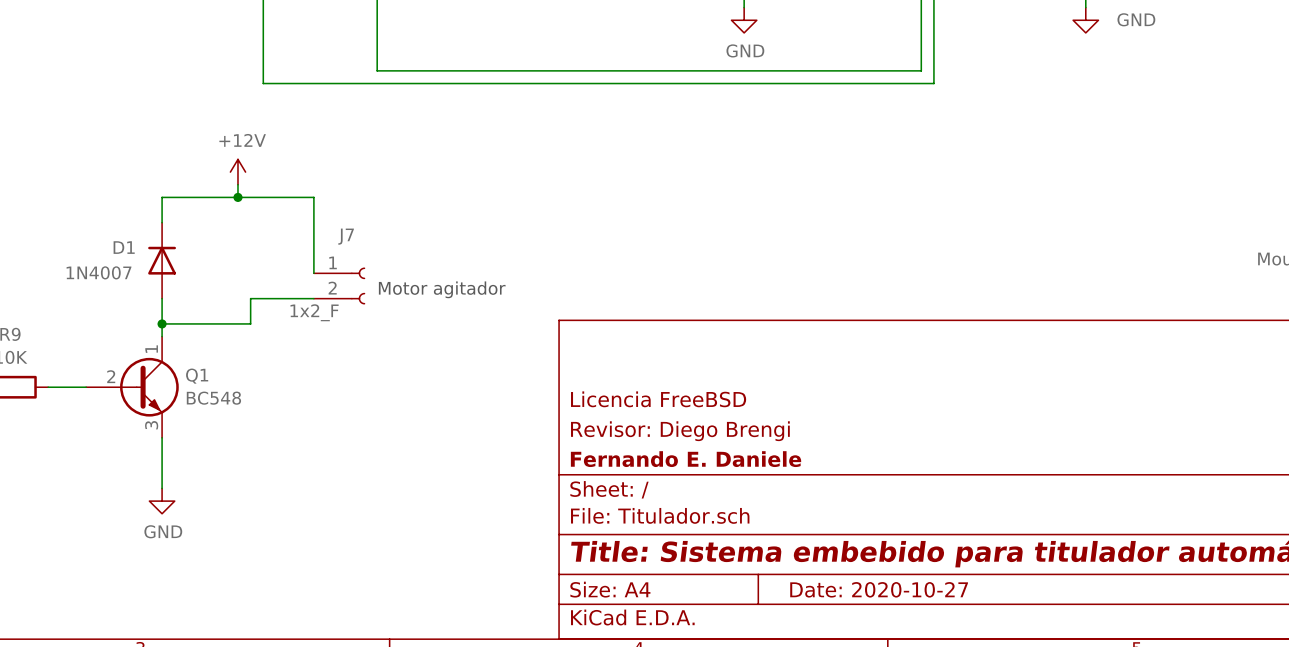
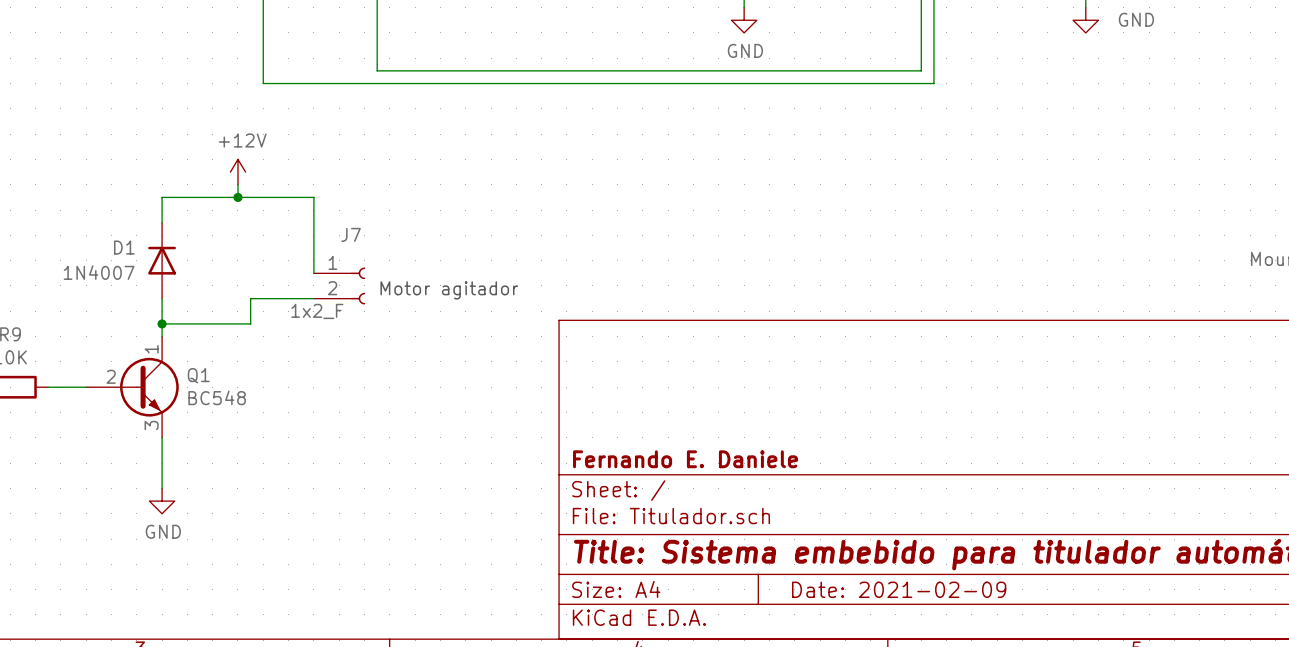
title block: Licencia FreeBSD (658, 399) -> none
title block: Revisor: Diego Brengi (680, 431) -> none
title block: Date: 2020-10-27 (879, 589) -> Date: 2021-02-09 (899, 589)

